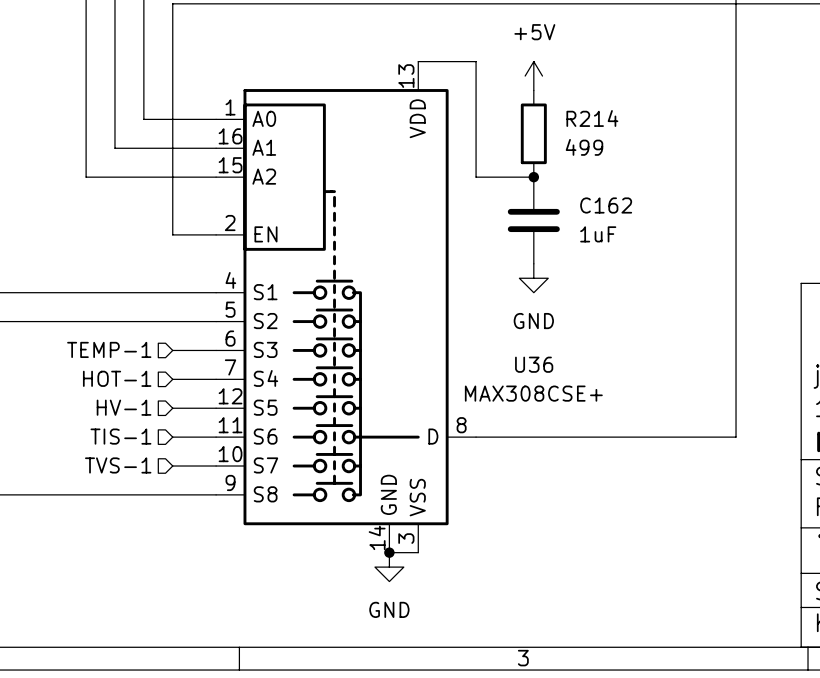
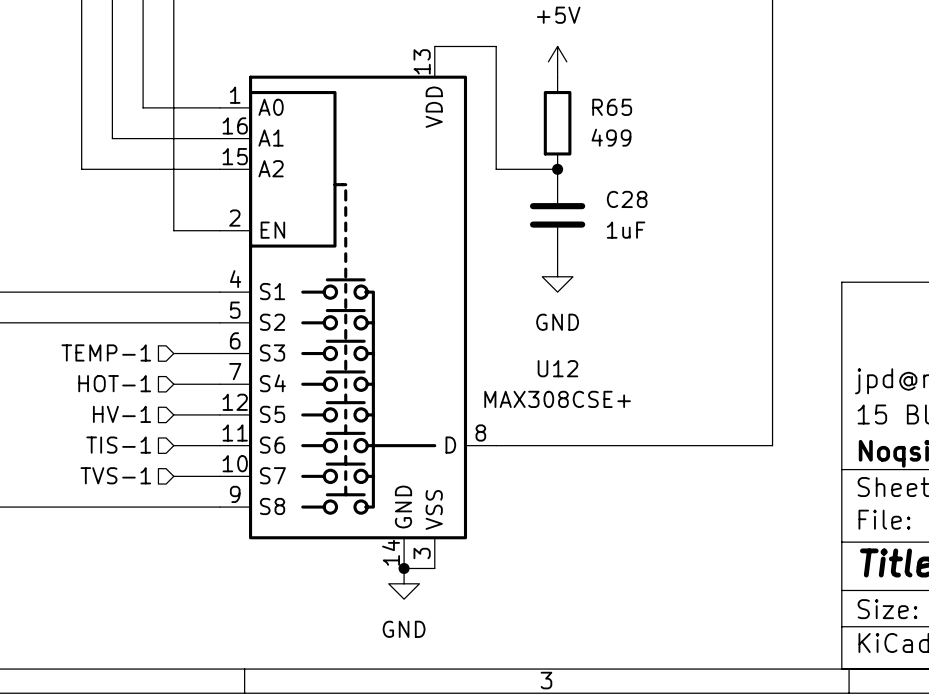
R214 name: R214 (592, 118) -> R65 (612, 107)
C162 name: C162 (606, 205) -> C28 (627, 199)
U36 name: U36 (534, 364) -> U12 (557, 368)

